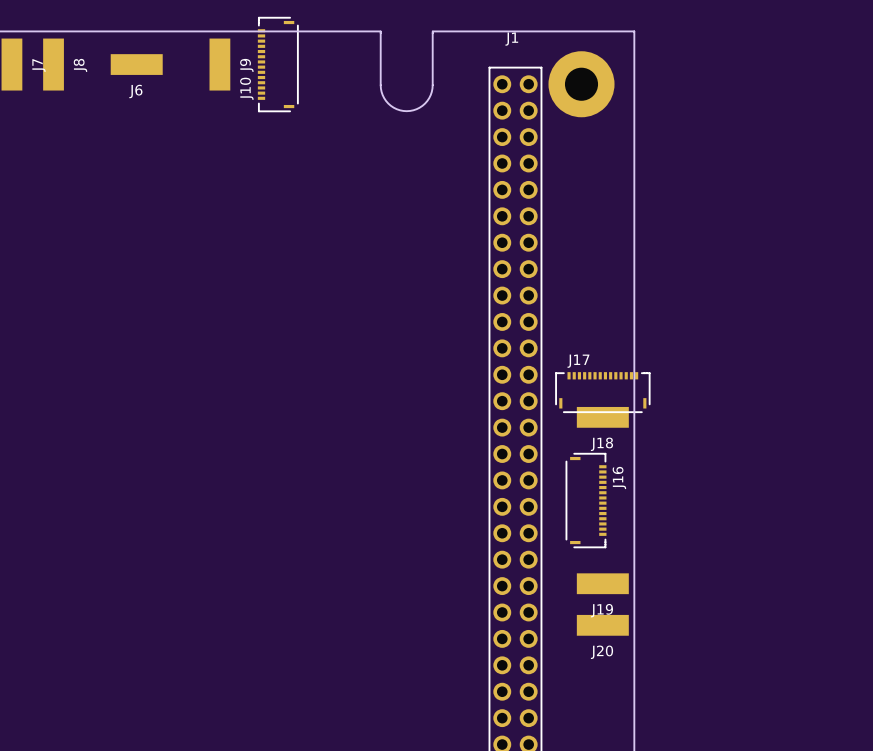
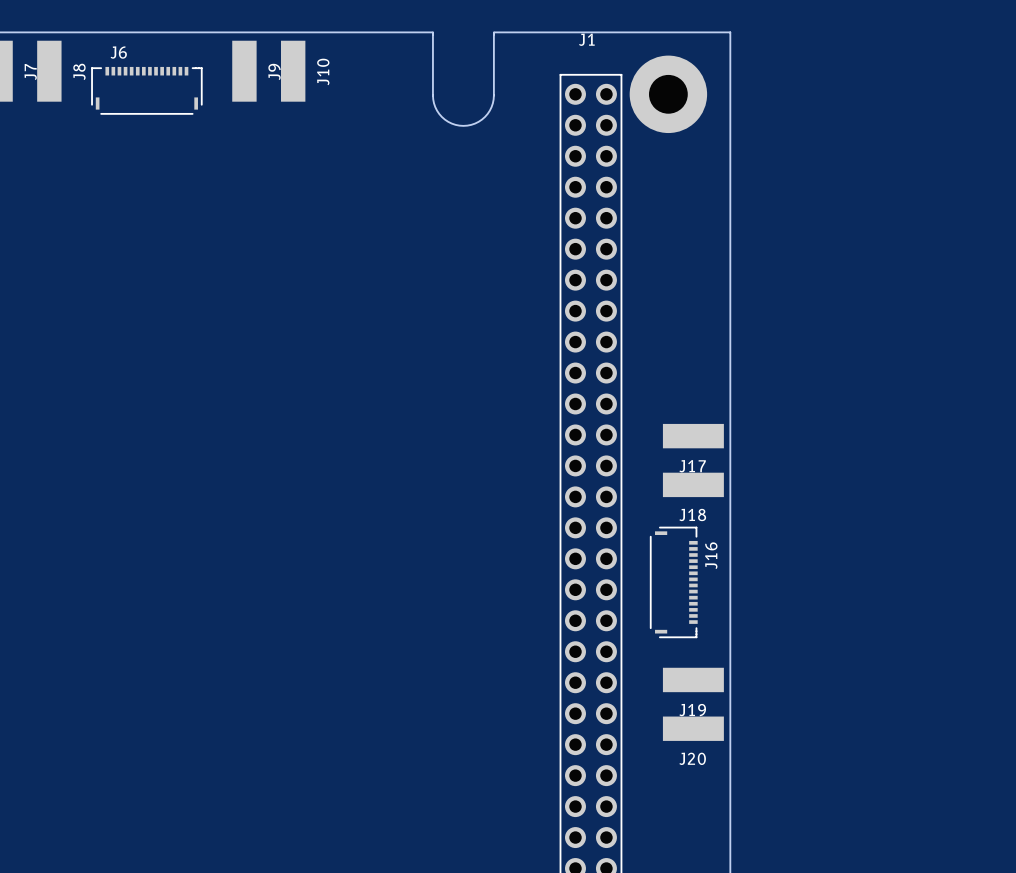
J10 footprint: [257, 16, 299, 113] -> [281, 40, 306, 102]
J6 footprint: [110, 54, 163, 75] -> [91, 66, 203, 115]
J10 name position: J10 (246, 88) -> J10 (323, 71)
J6 name position: J6 (135, 91) -> J6 (118, 52)
J17 name position: J17 (578, 361) -> J17 (692, 466)
J17 footprint: [555, 372, 651, 413] -> [662, 423, 724, 449]

